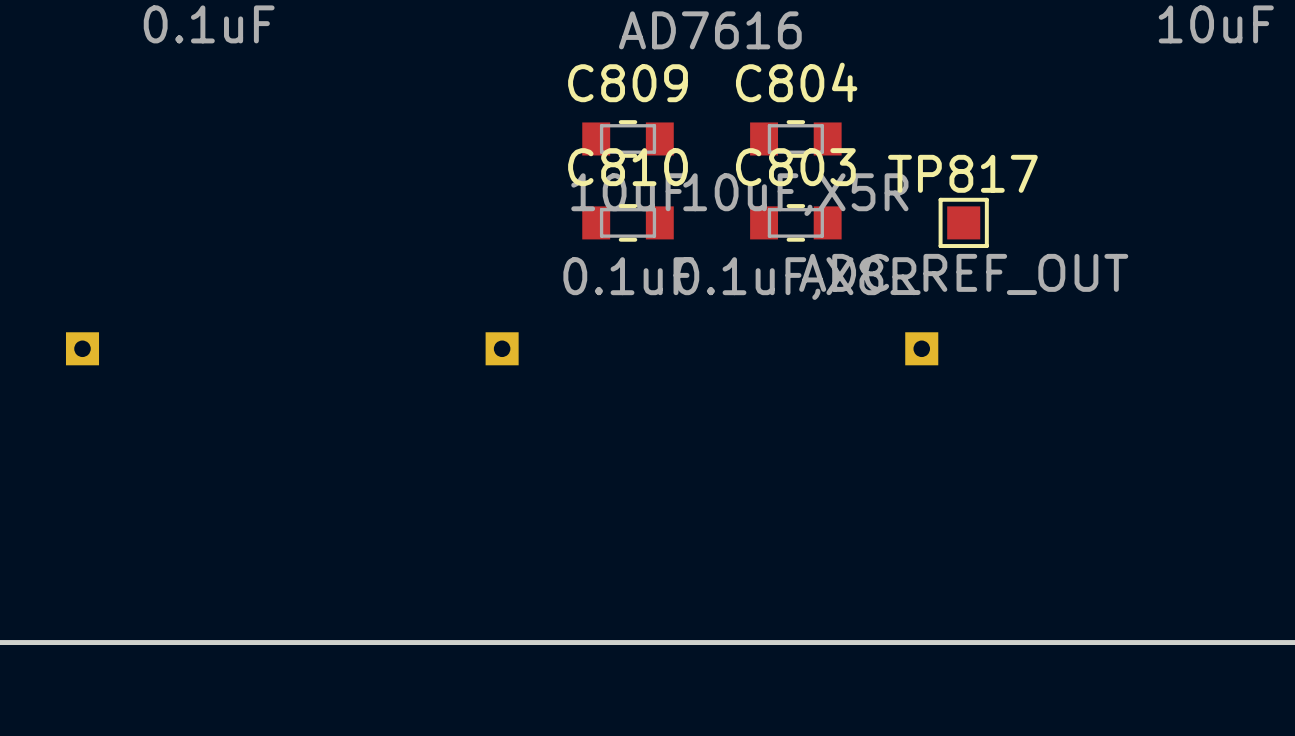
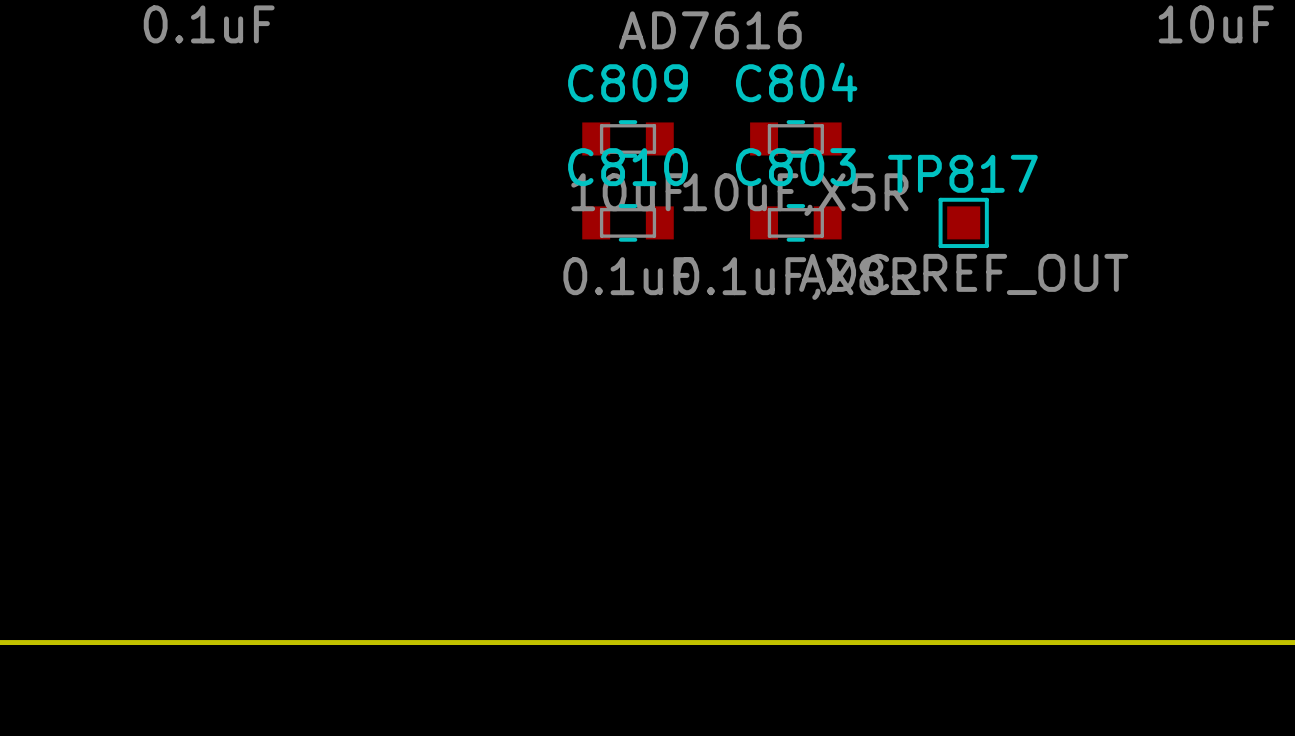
part: (82, 348) -> none
part: (502, 348) -> none
part: (921, 348) -> none

